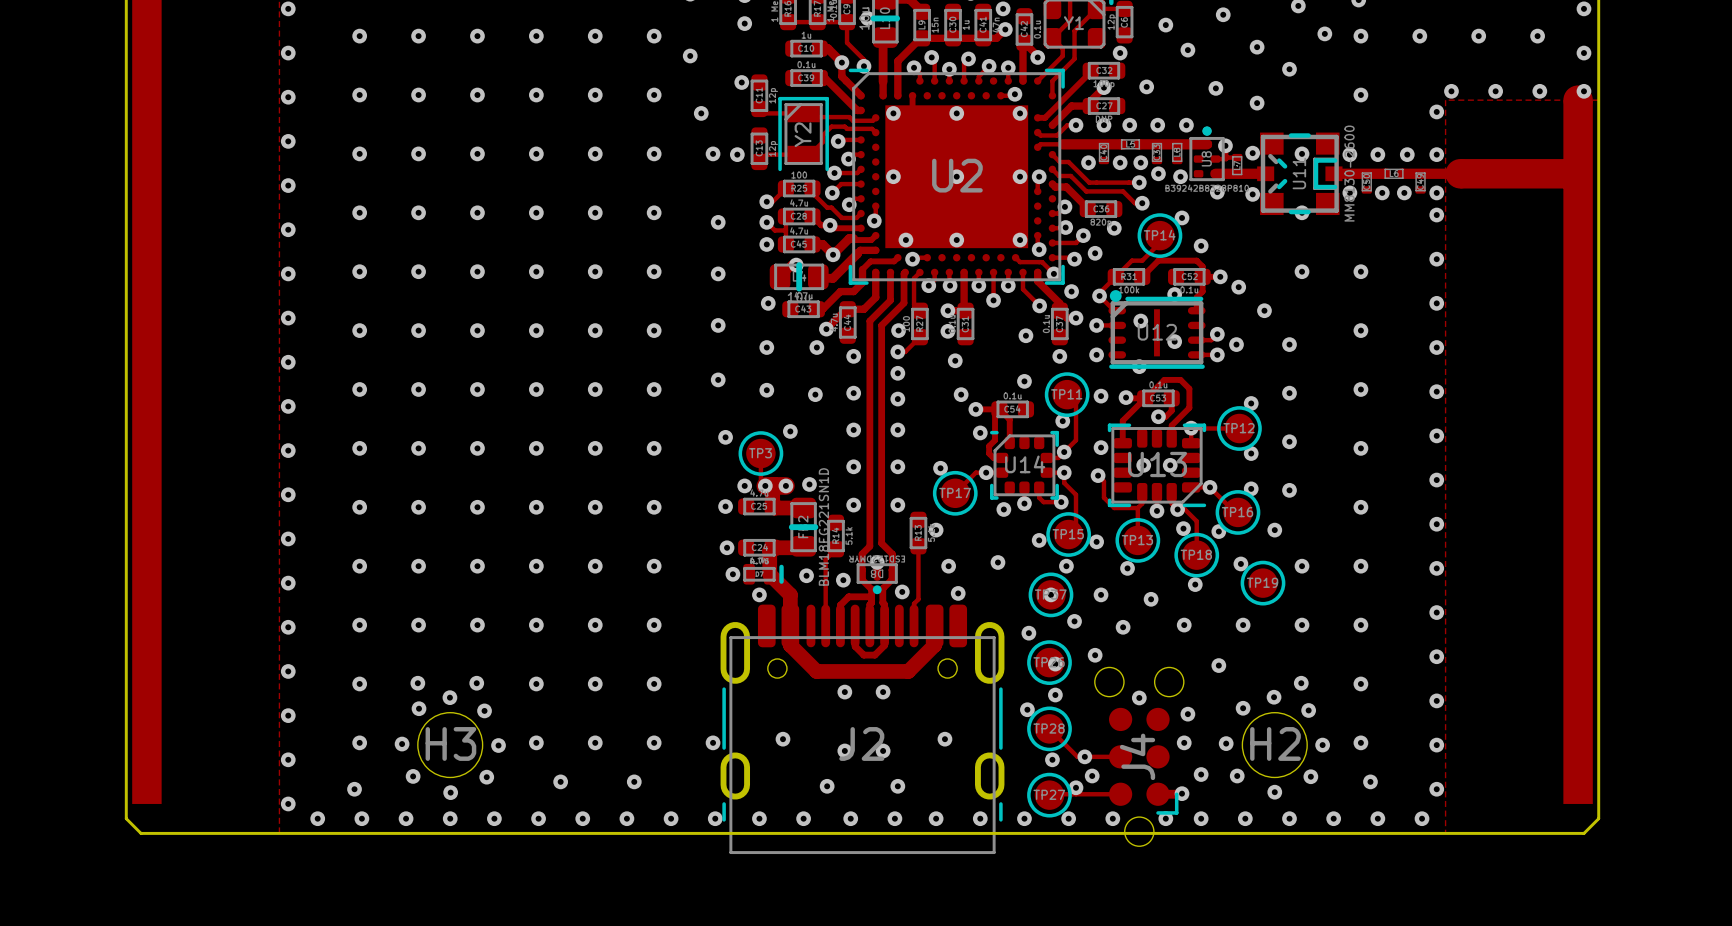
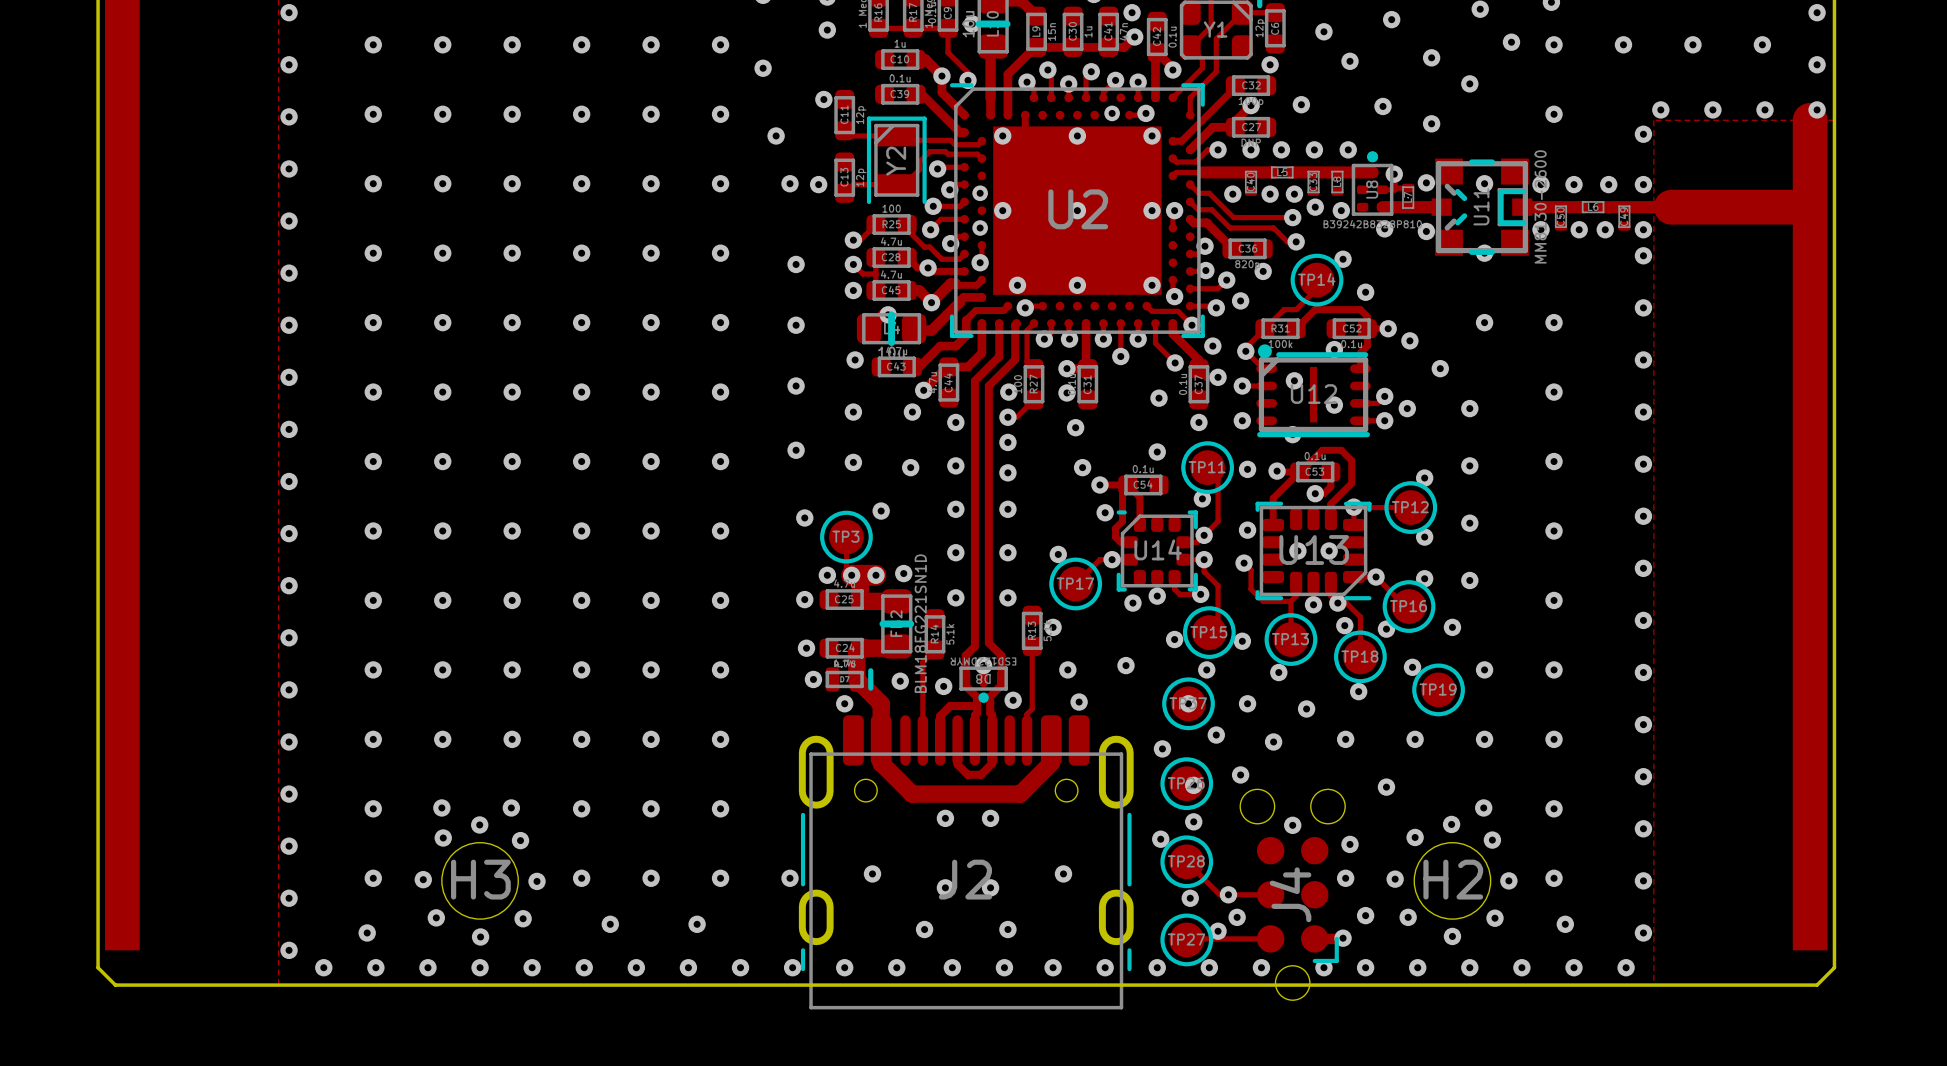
via: none -> (1112, 113)
via: none -> (980, 193)
via: none -> (980, 228)

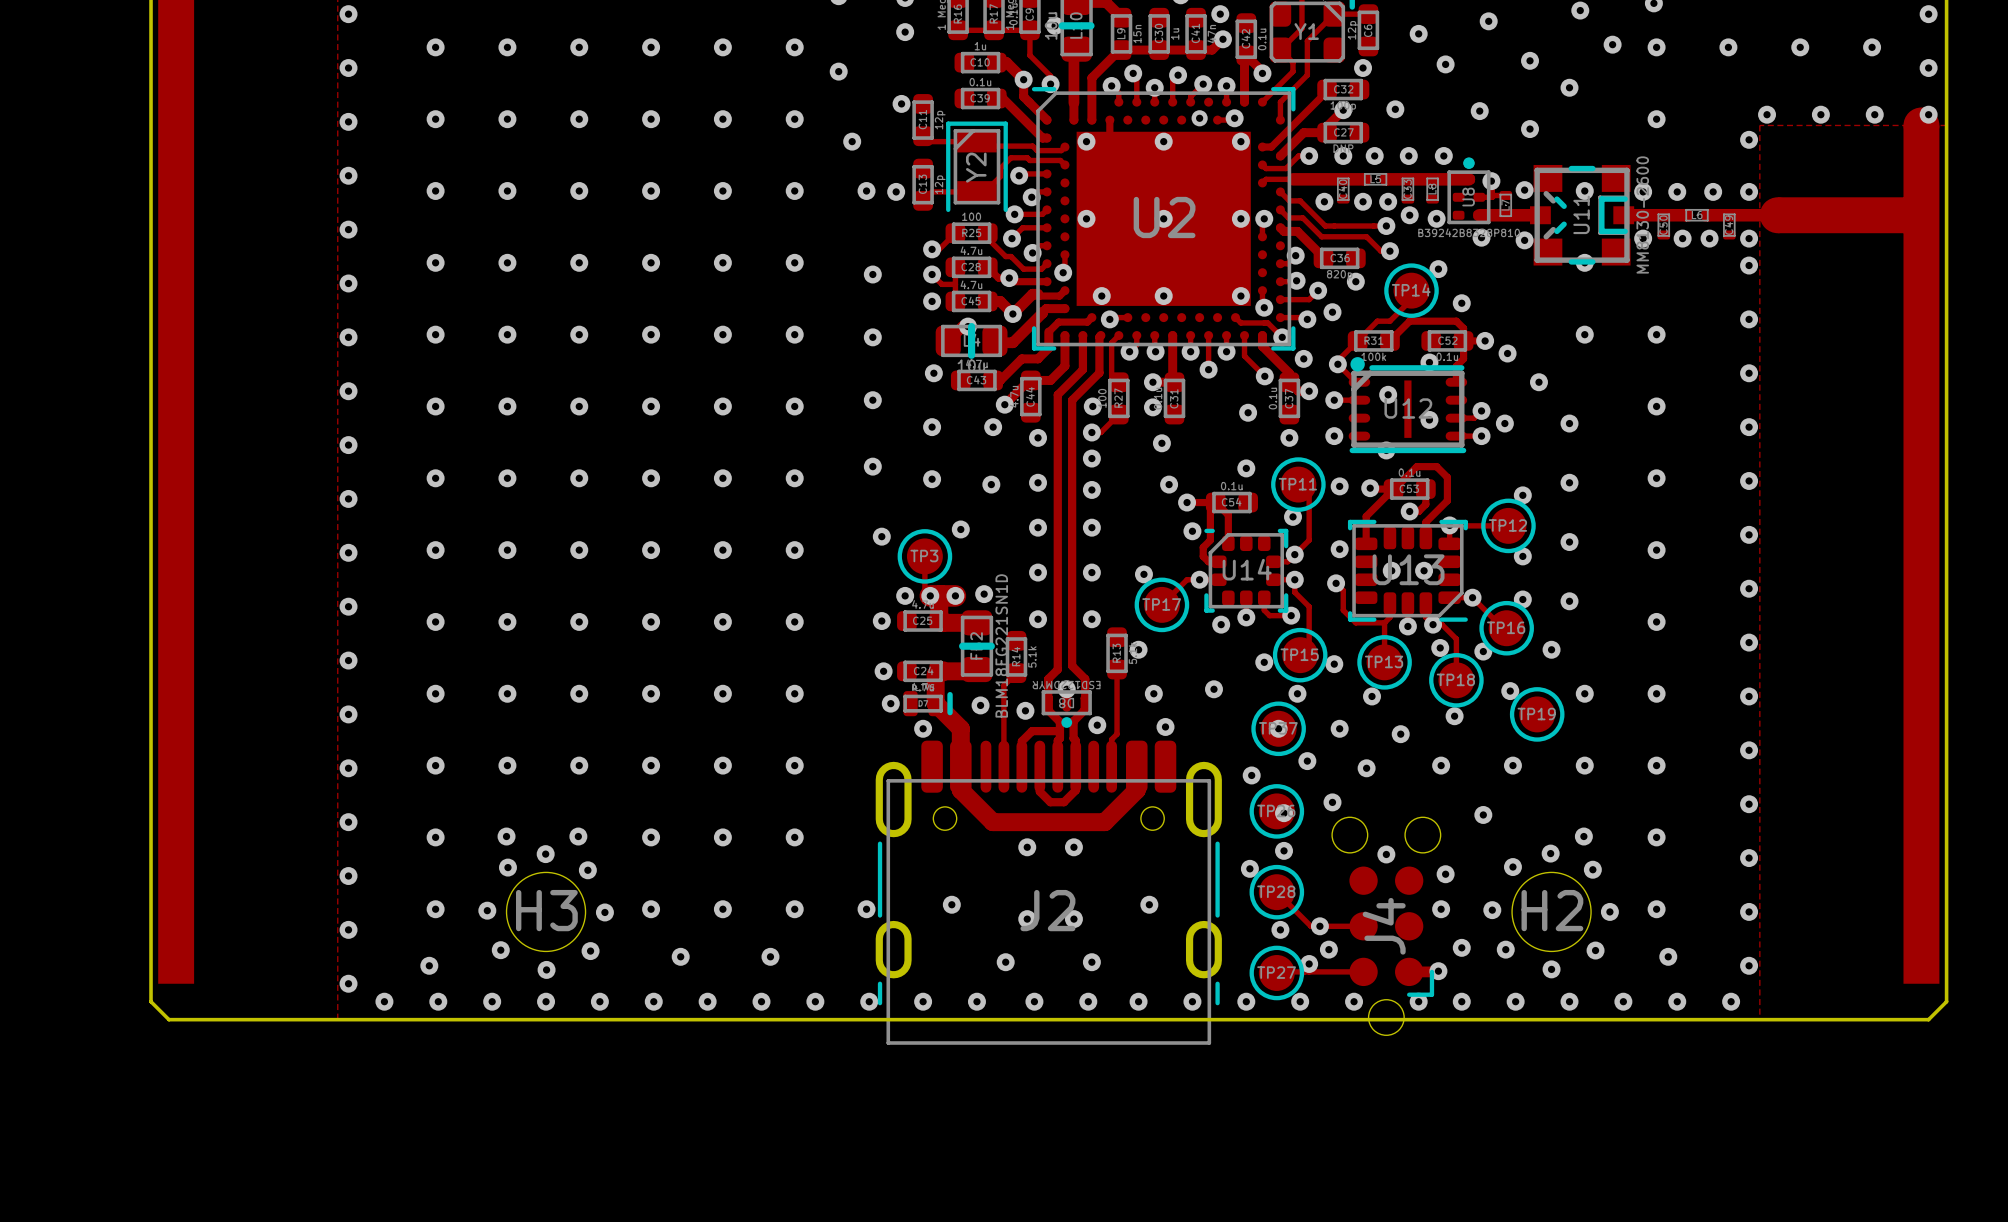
via: (980, 193) -> none
via: (980, 228) -> none

